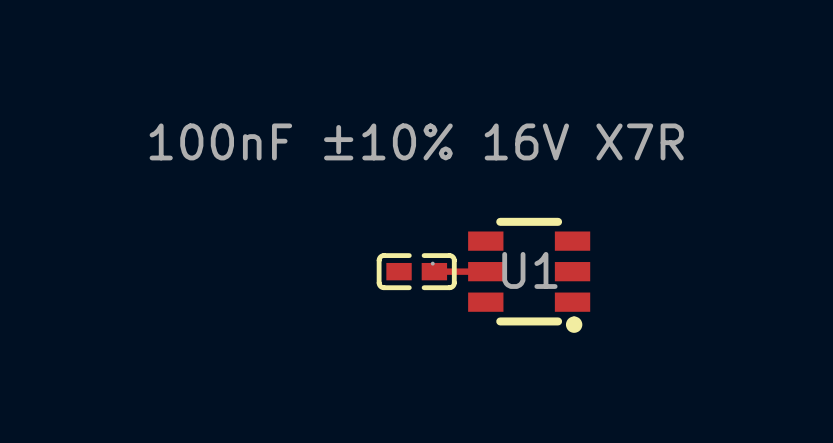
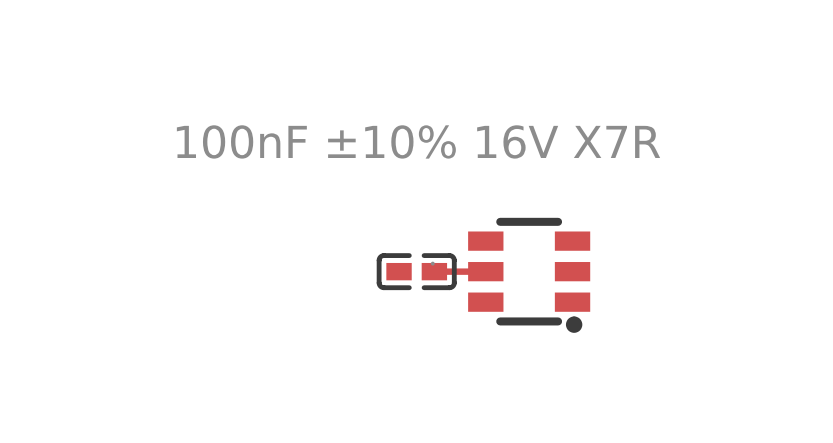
U1 name: U1 (529, 270) -> none

